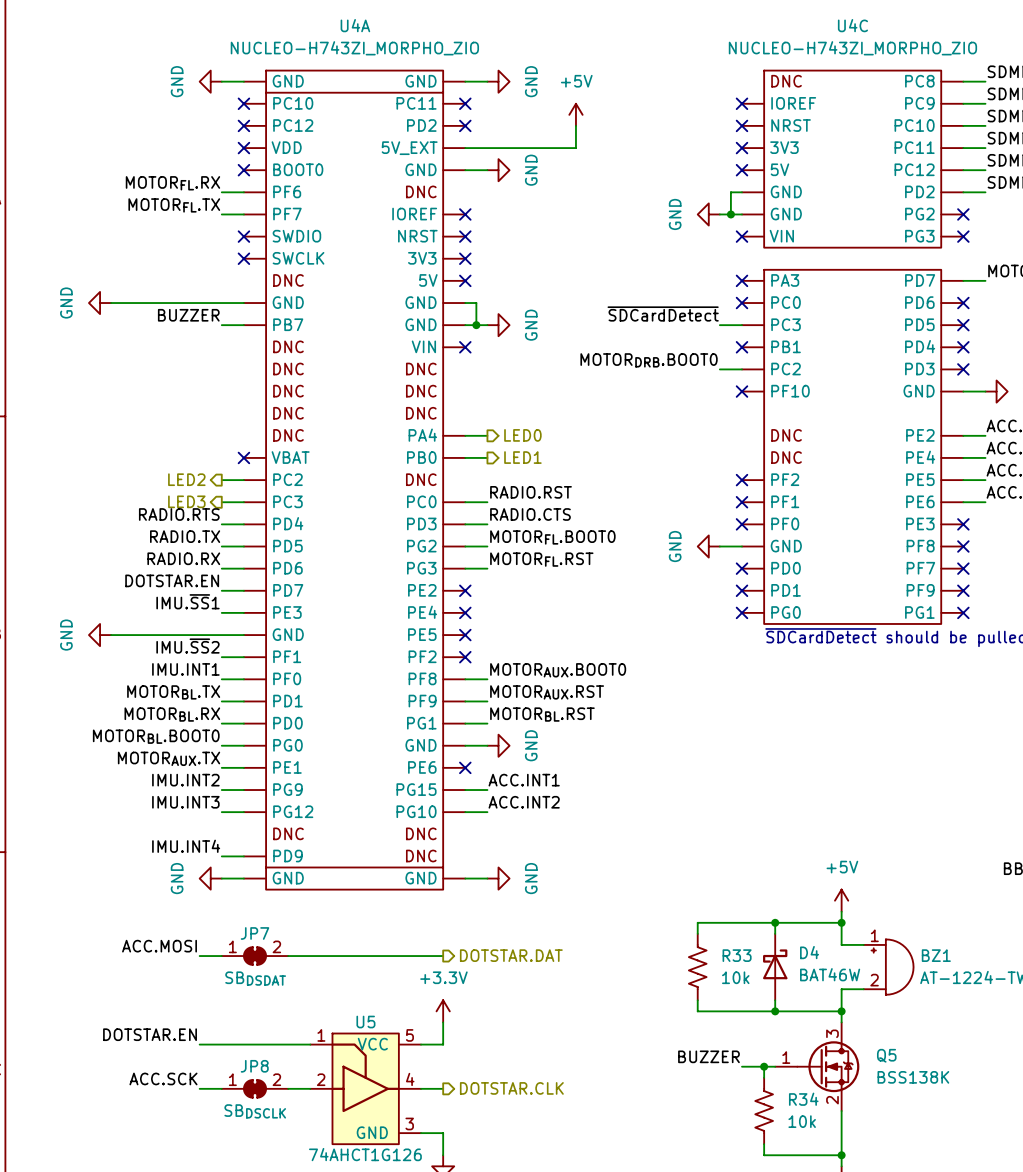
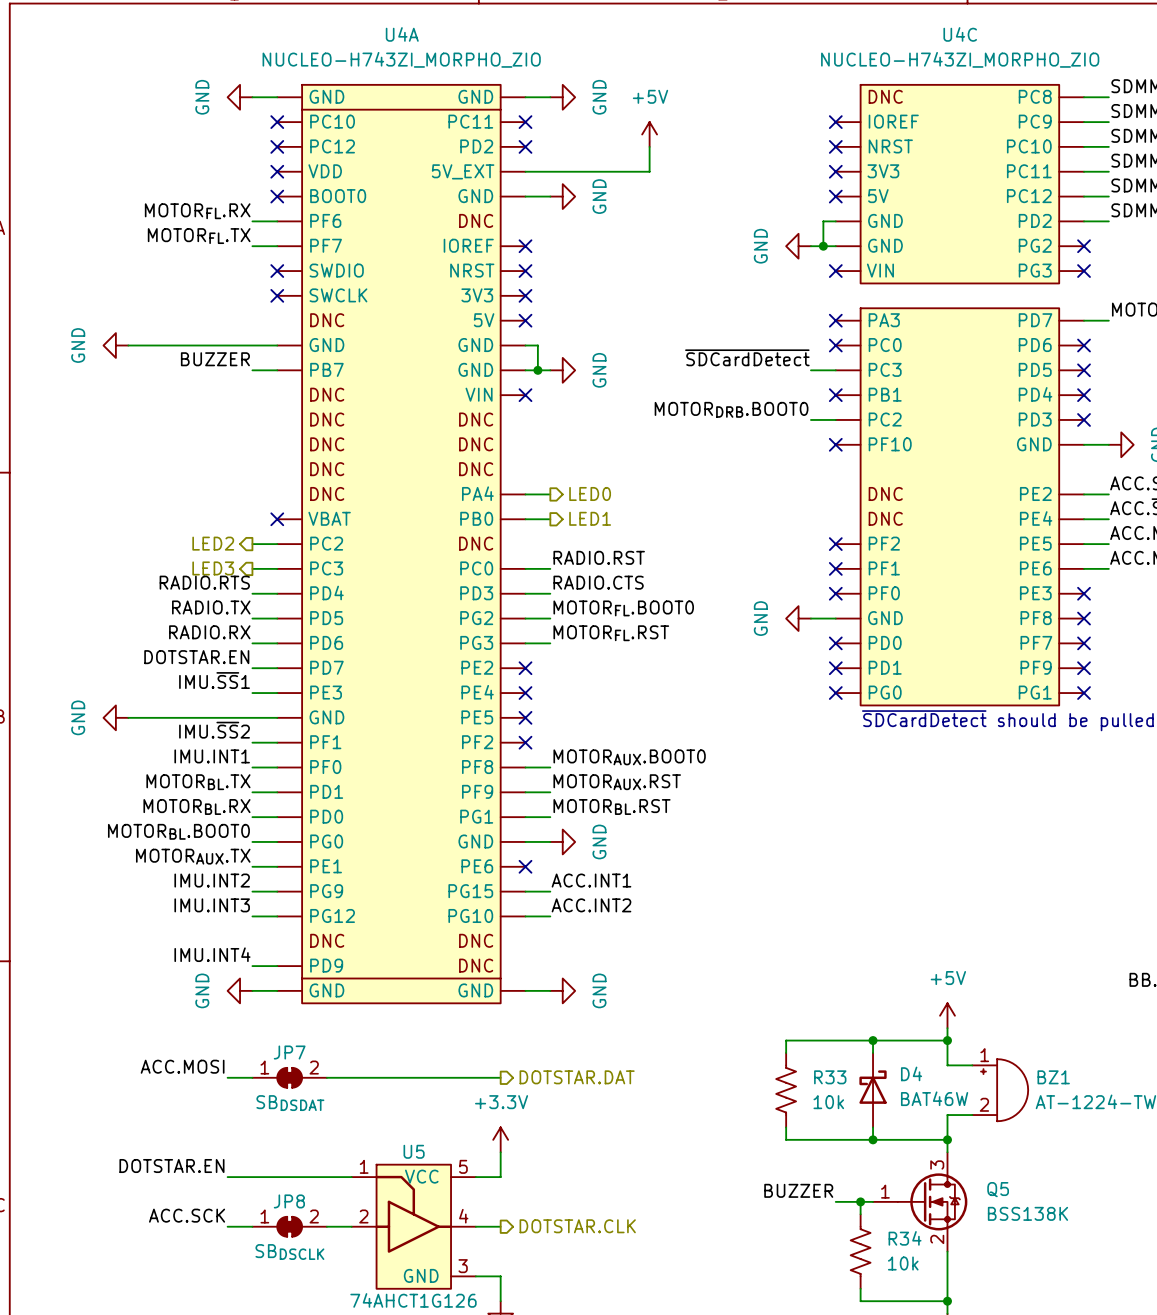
U4A symbol: [243, 69, 466, 891] -> [277, 84, 526, 1005]
U4C symbol: [742, 69, 964, 625] -> [835, 84, 1085, 707]

